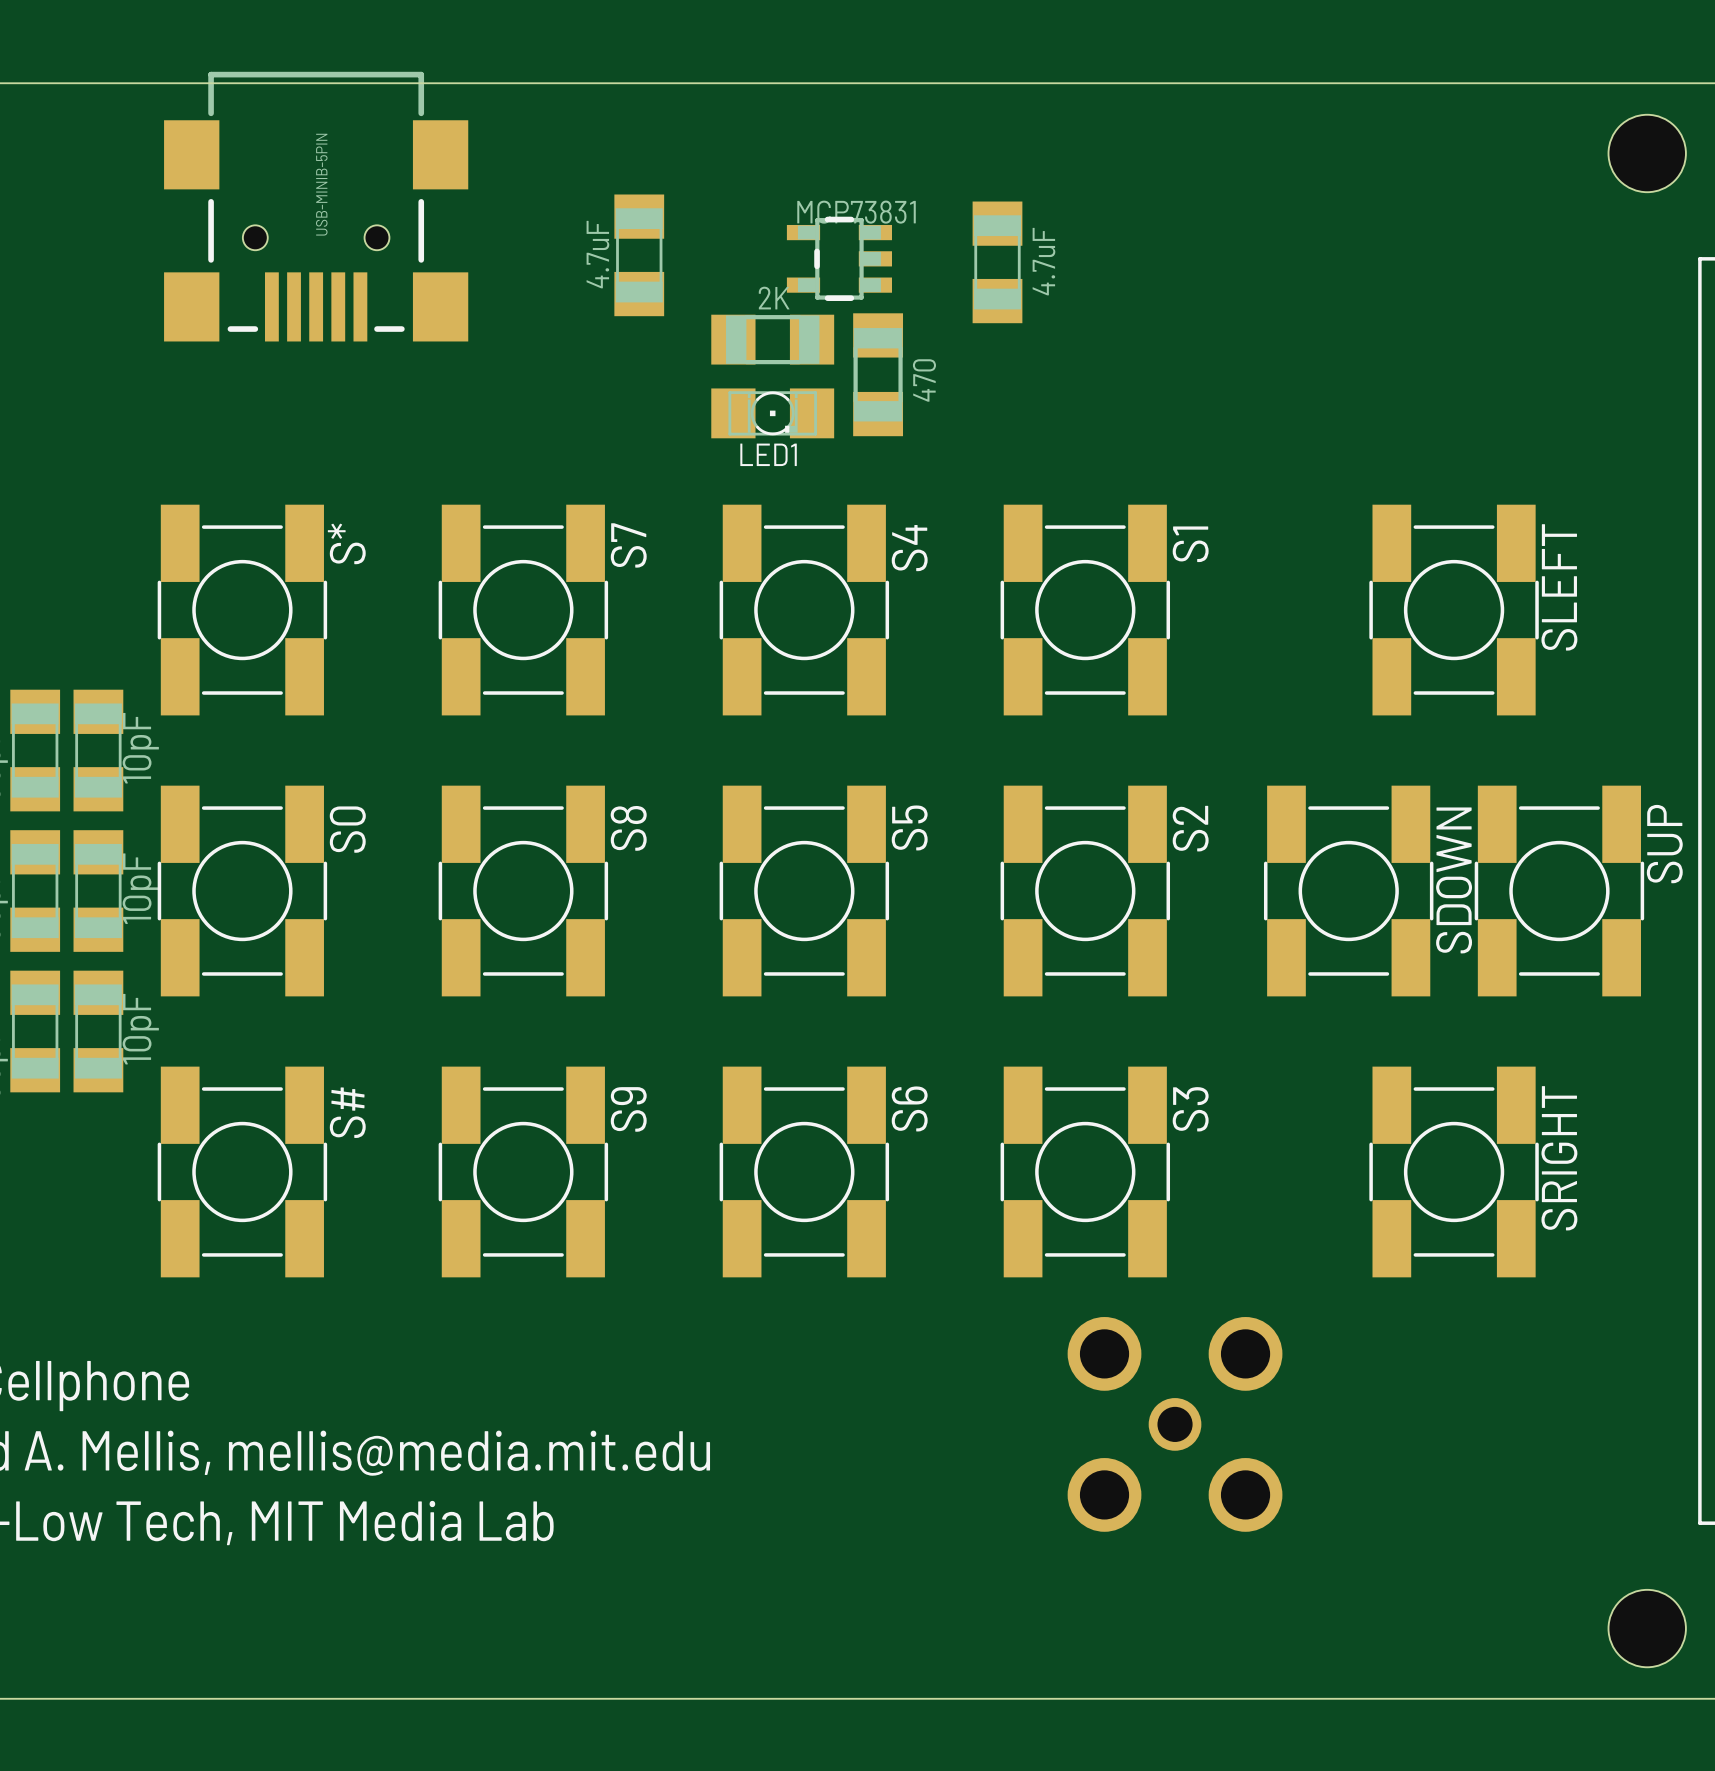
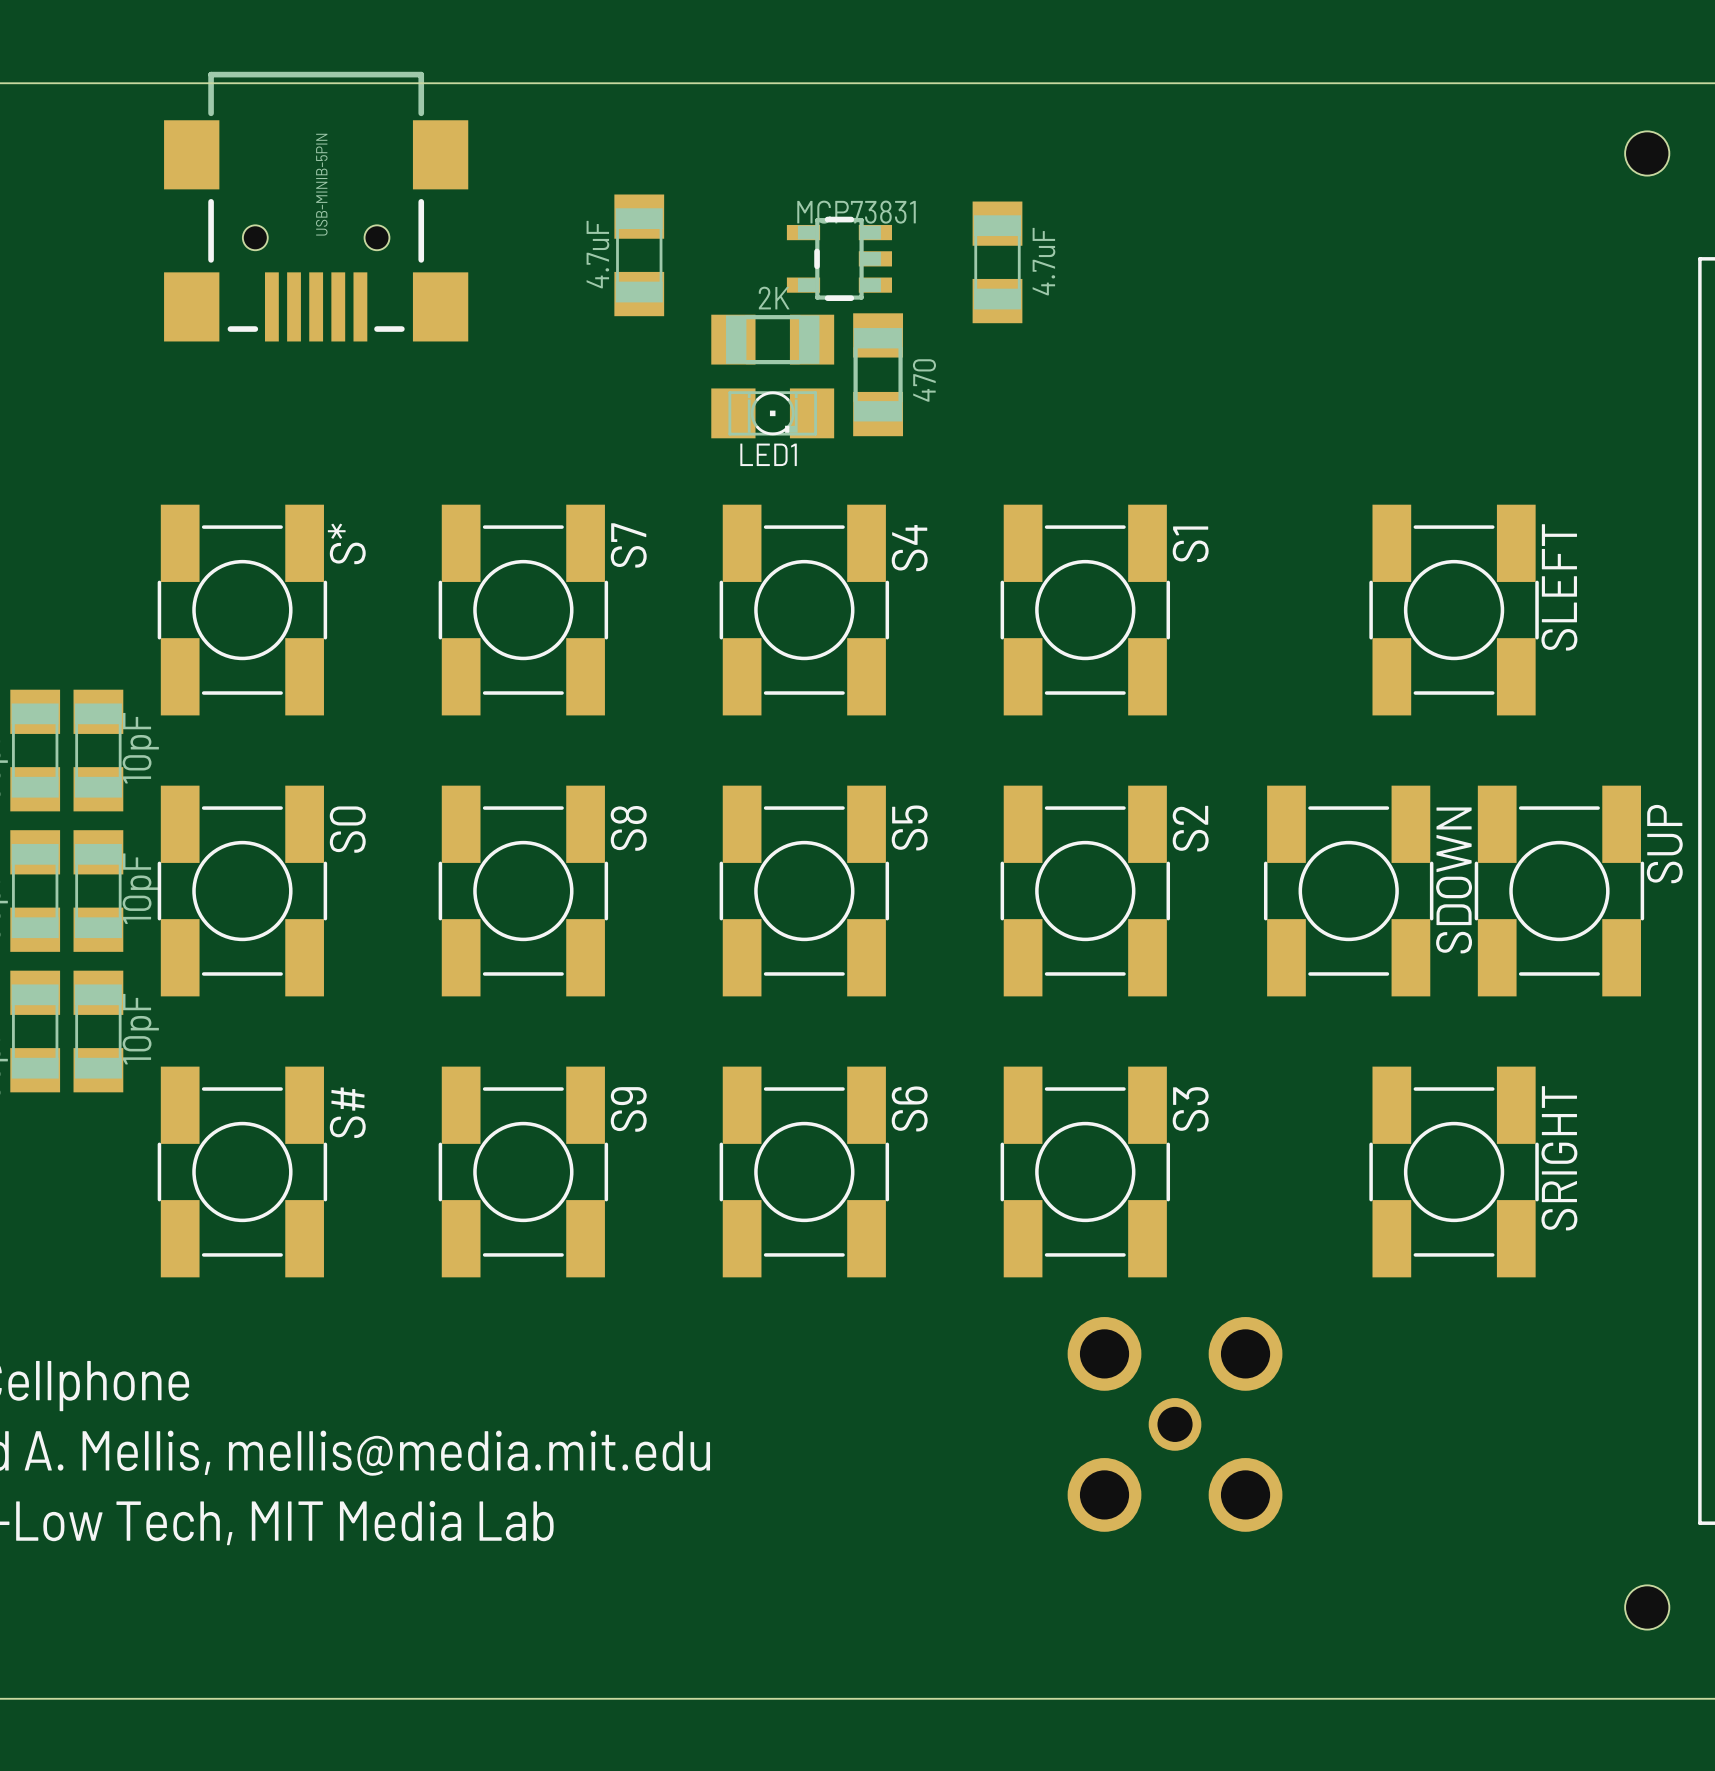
hole size: [1608, 114, 1686, 193] -> [1625, 131, 1670, 176]
hole size: [1608, 1589, 1686, 1668] -> [1625, 1585, 1670, 1630]

